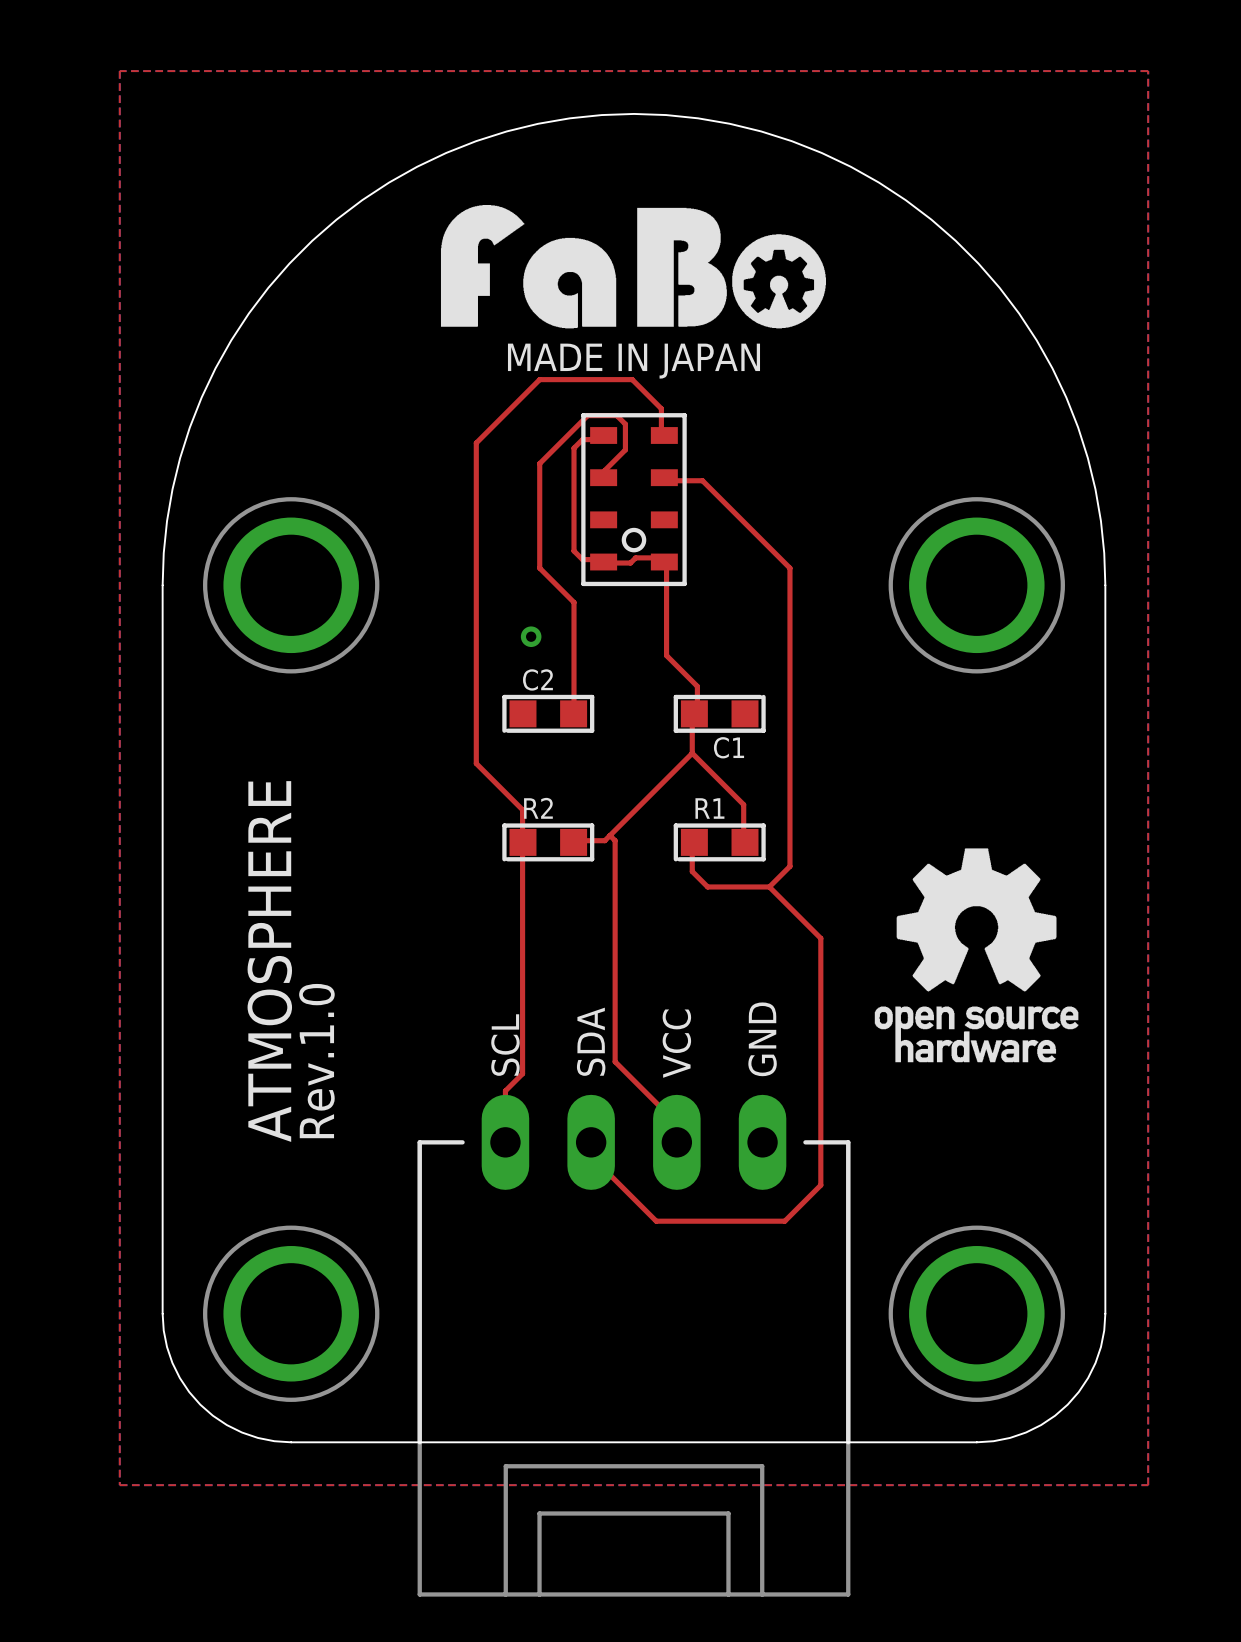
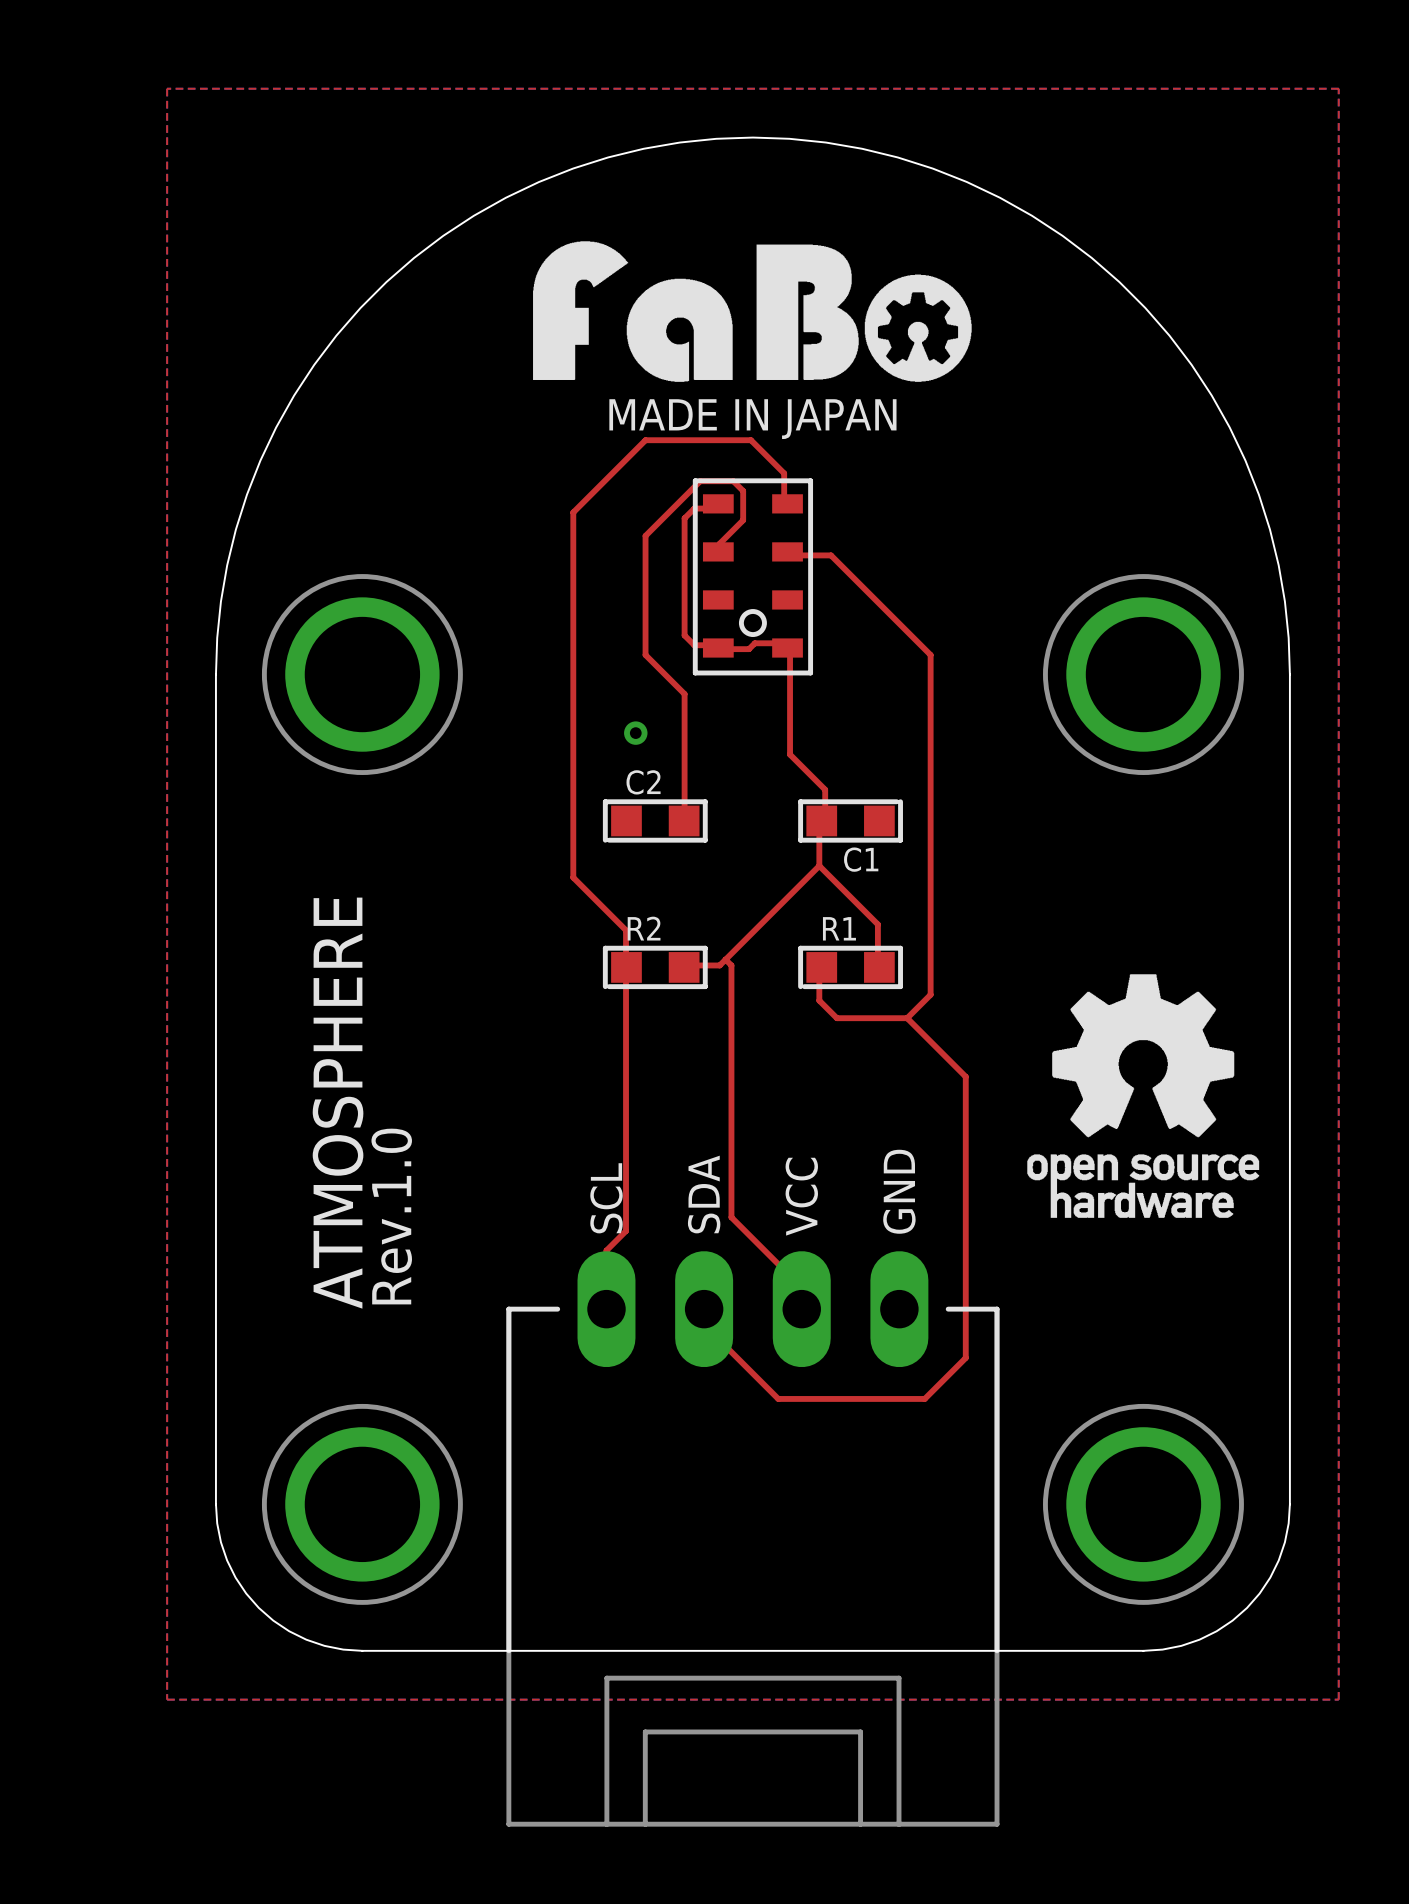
part footprint: [162, 113, 1106, 1597] -> [215, 137, 1290, 1827]

